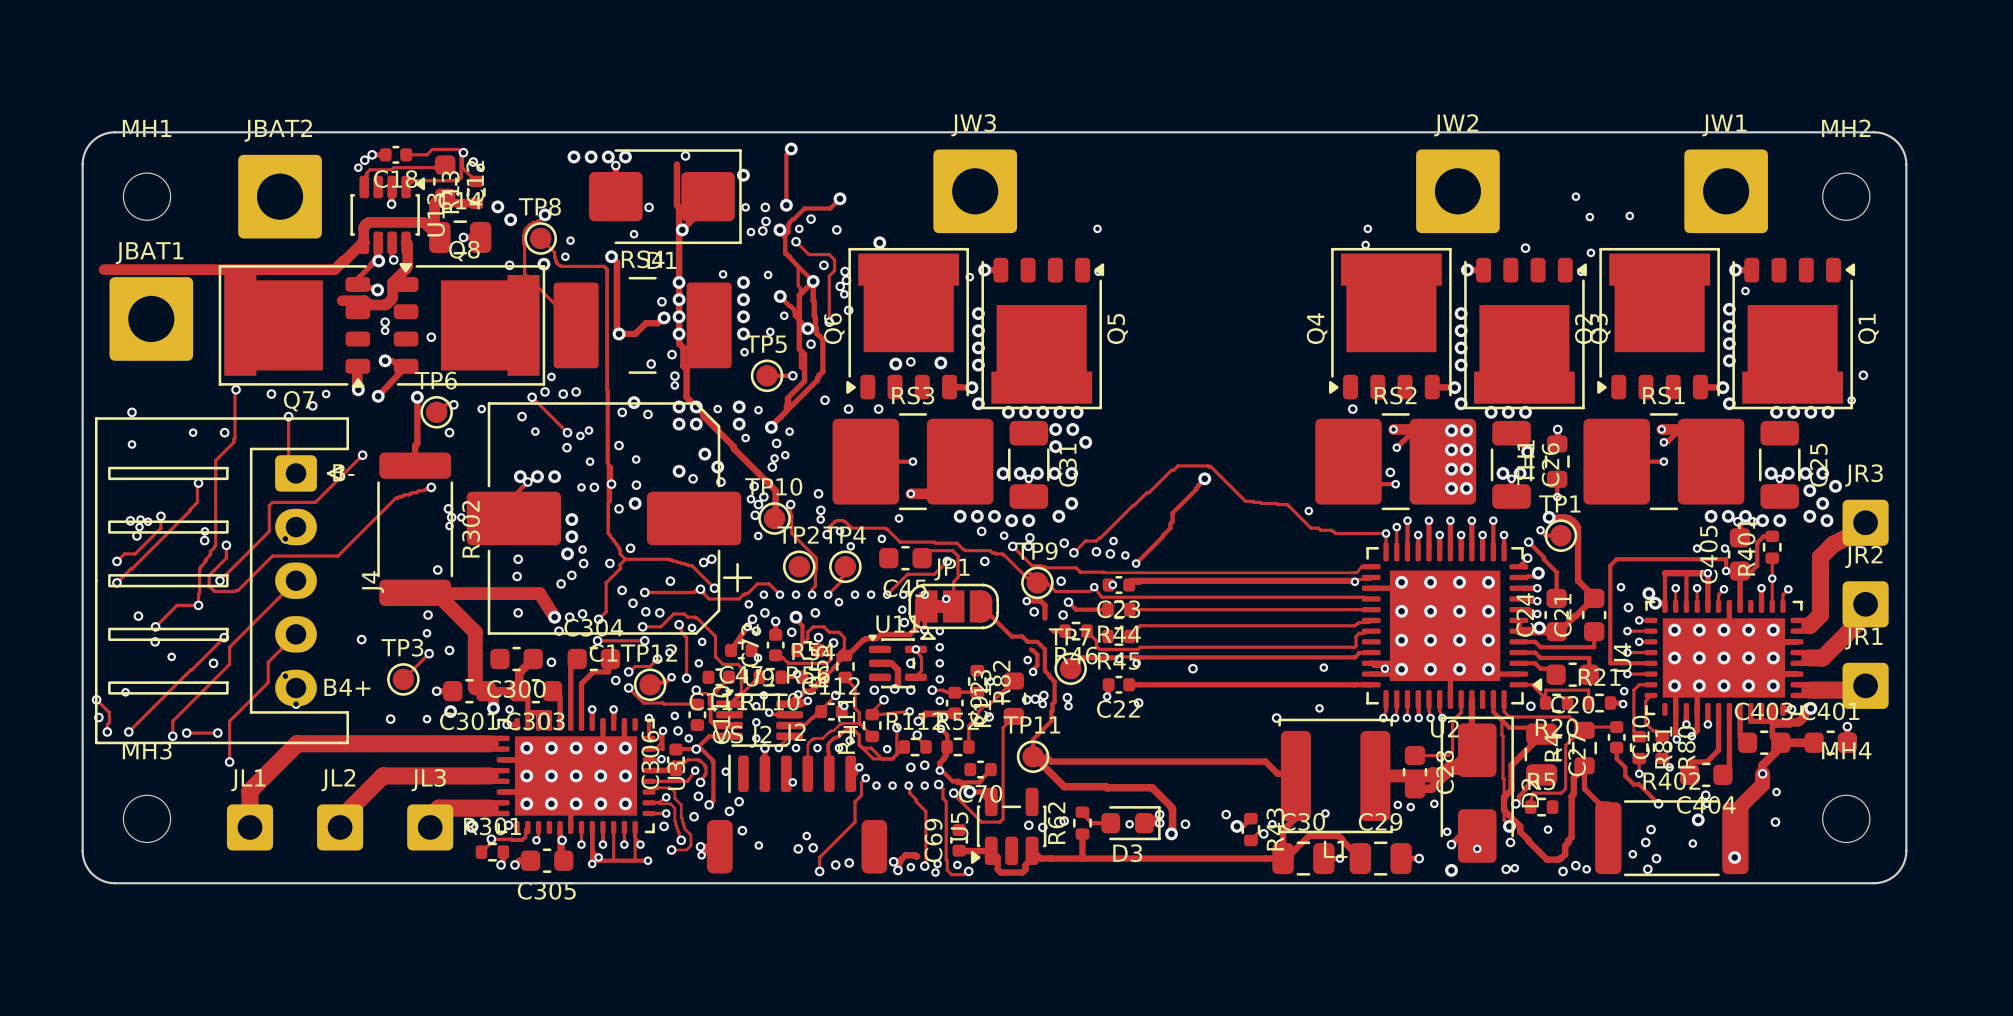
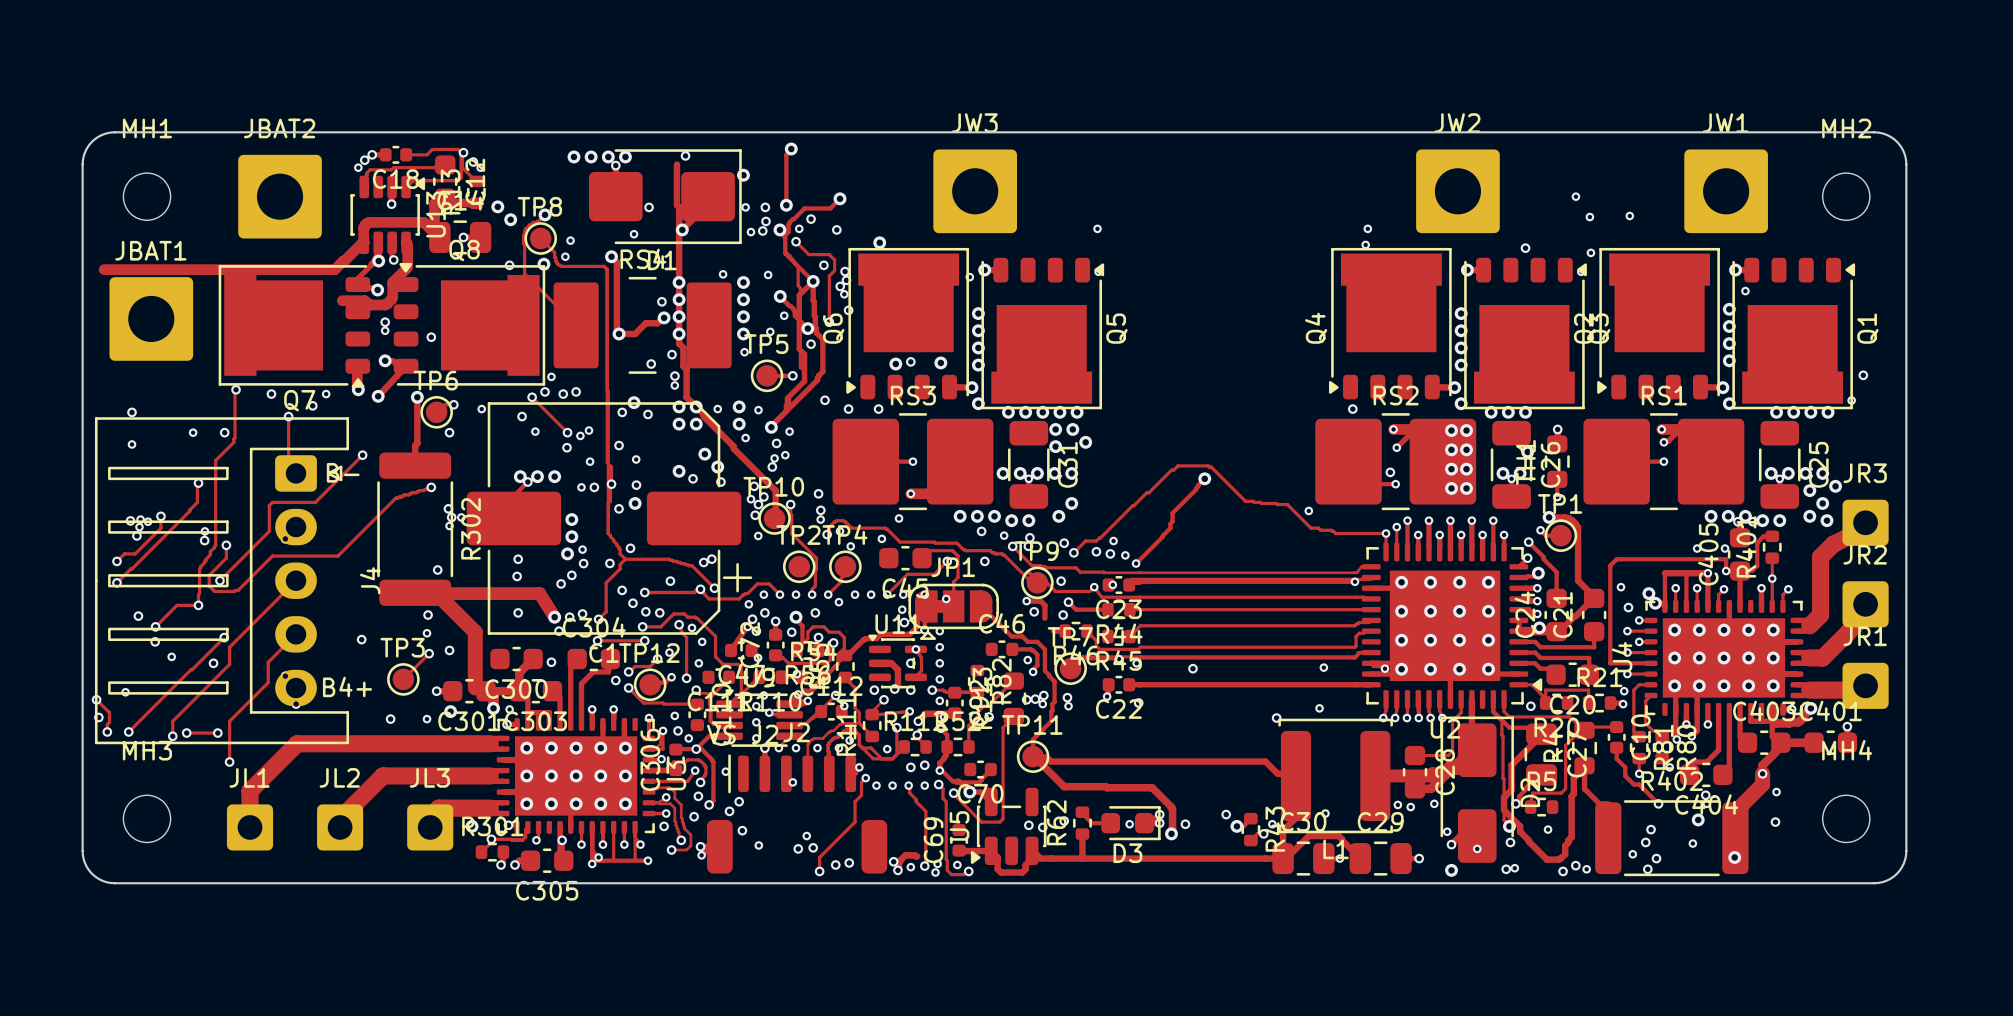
C46: none -> (1002, 649)
track: none -> (1012, 649) (1030, 649)

